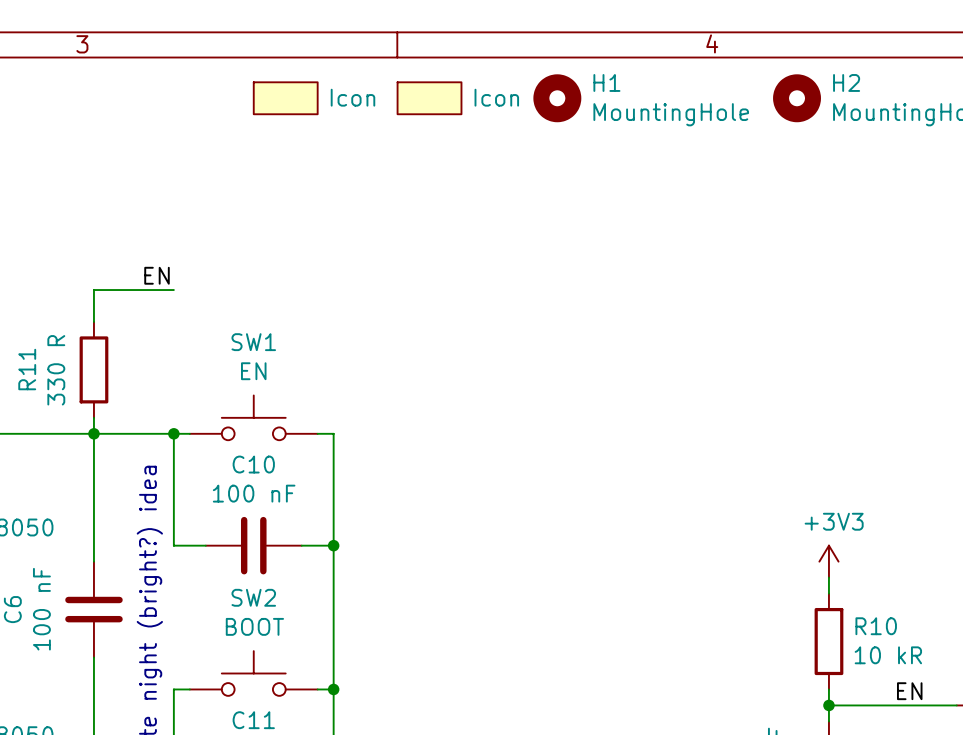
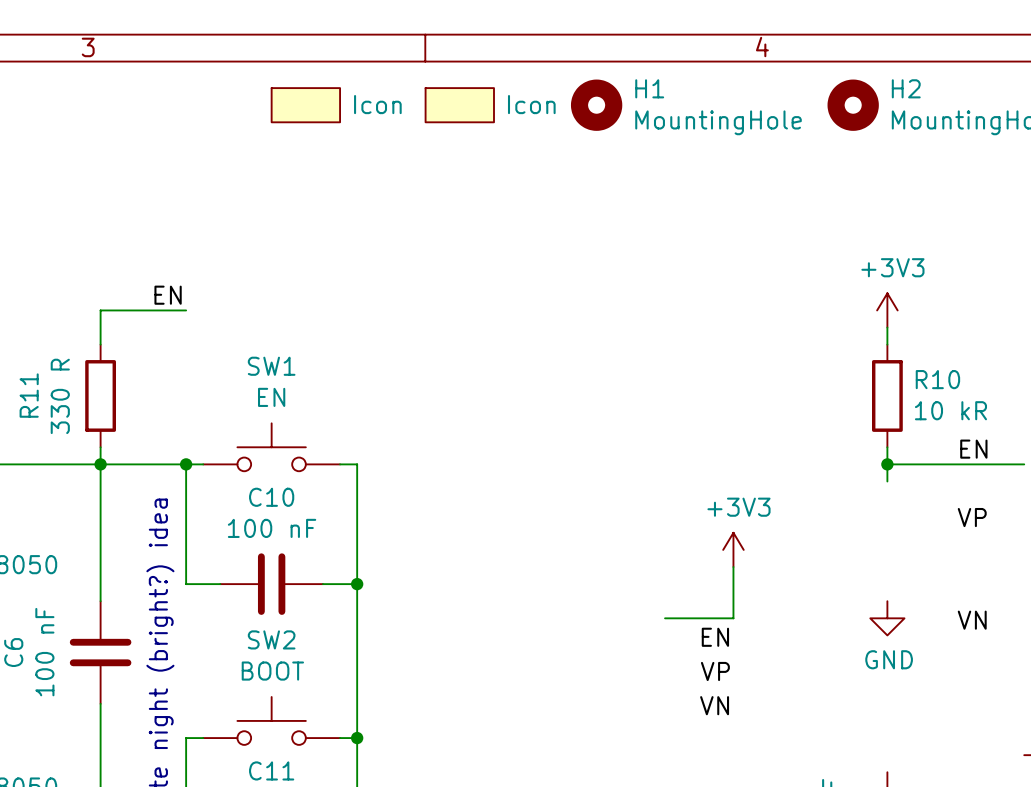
power symbol: none -> +3V3 (887, 310)
label: none -> EN (973, 449)
junction: none -> (887, 464)
label: none -> VP (972, 517)
power symbol: none -> +3V3 (733, 549)
wire: none -> (733, 567) (733, 618) (665, 618)
power symbol: +3V3 (828, 561) -> none
wire: (828, 577) (828, 593) -> (887, 327) (887, 344)
power symbol: none -> GND (887, 618)
label: none -> VN (972, 620)
label: none -> EN (715, 637)
label: none -> VP (715, 671)
R10 position: (828, 641) -> (887, 395)
label: none -> VN (714, 705)
wire: (828, 689) (828, 721) -> (887, 447) (887, 481)
label: EN (909, 691) -> none
wire: (828, 705) (956, 705) -> (887, 464) (1024, 464)
junction: (828, 705) -> none

